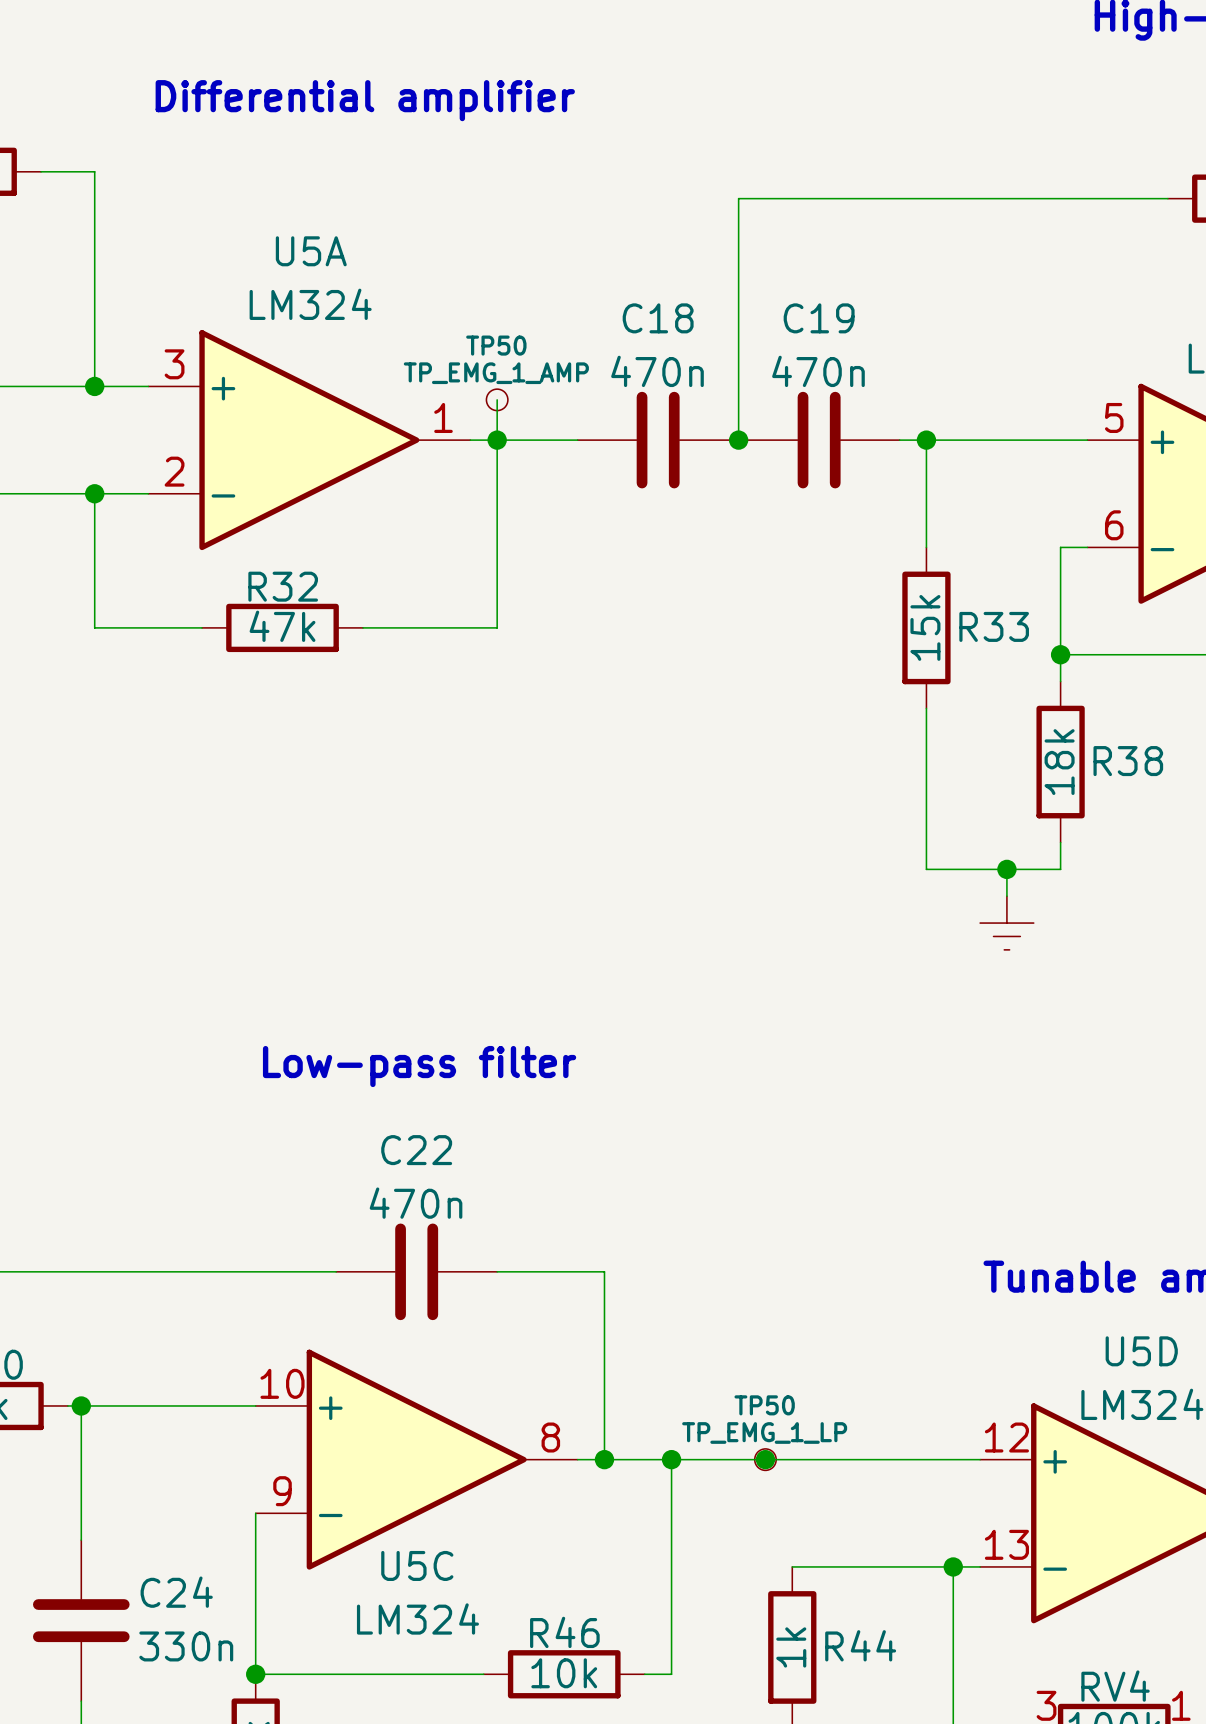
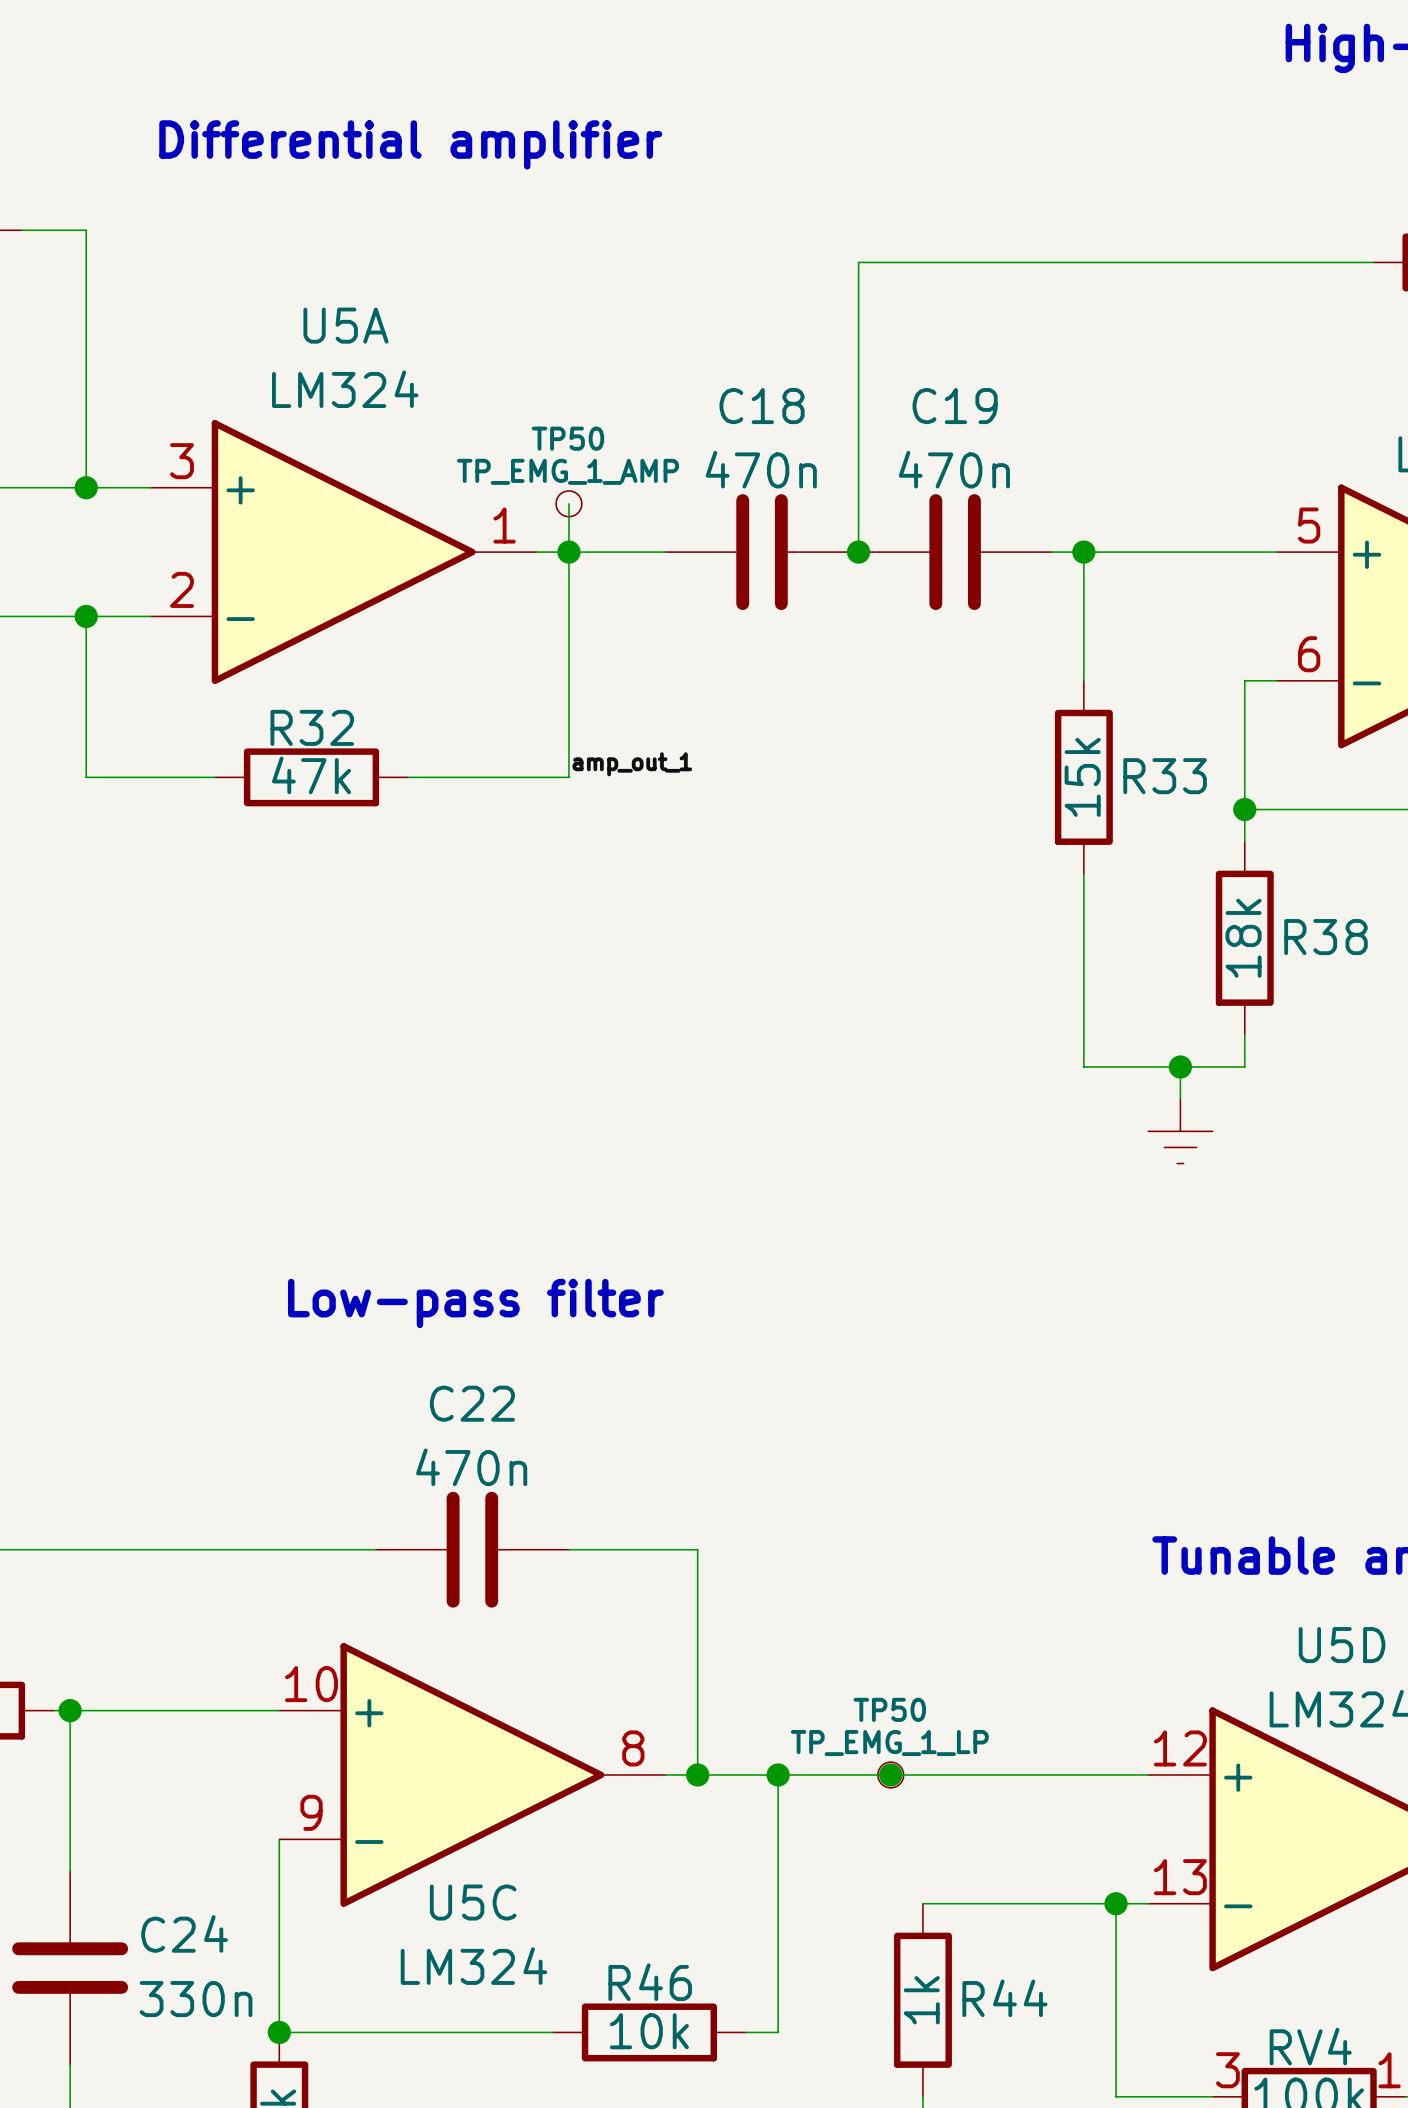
label: none -> amp_out_1 (632, 764)

